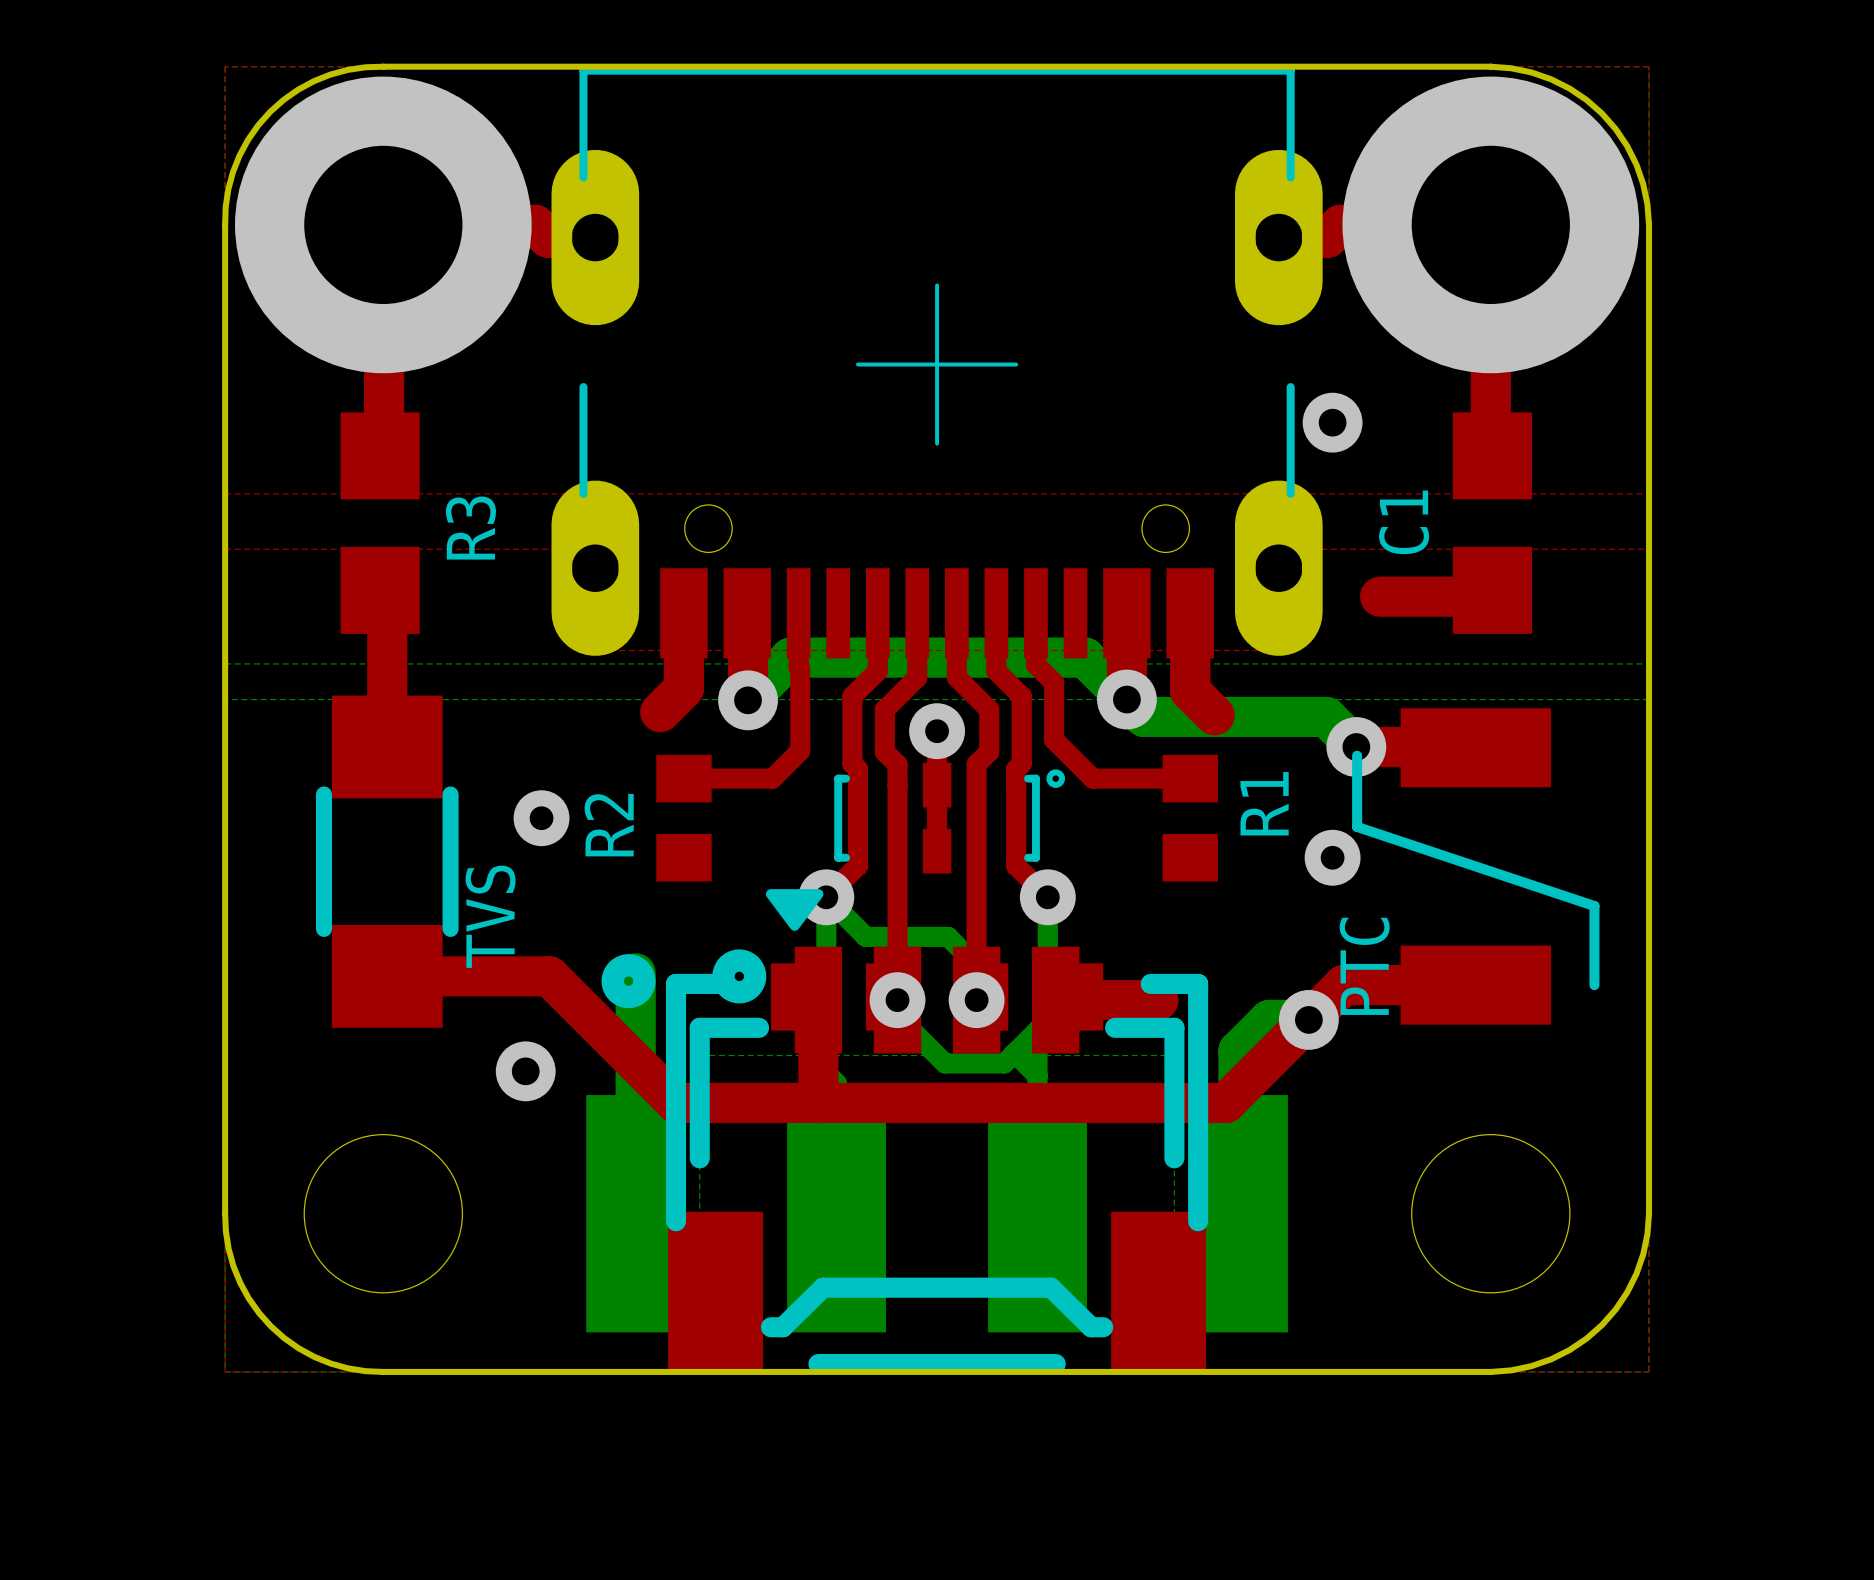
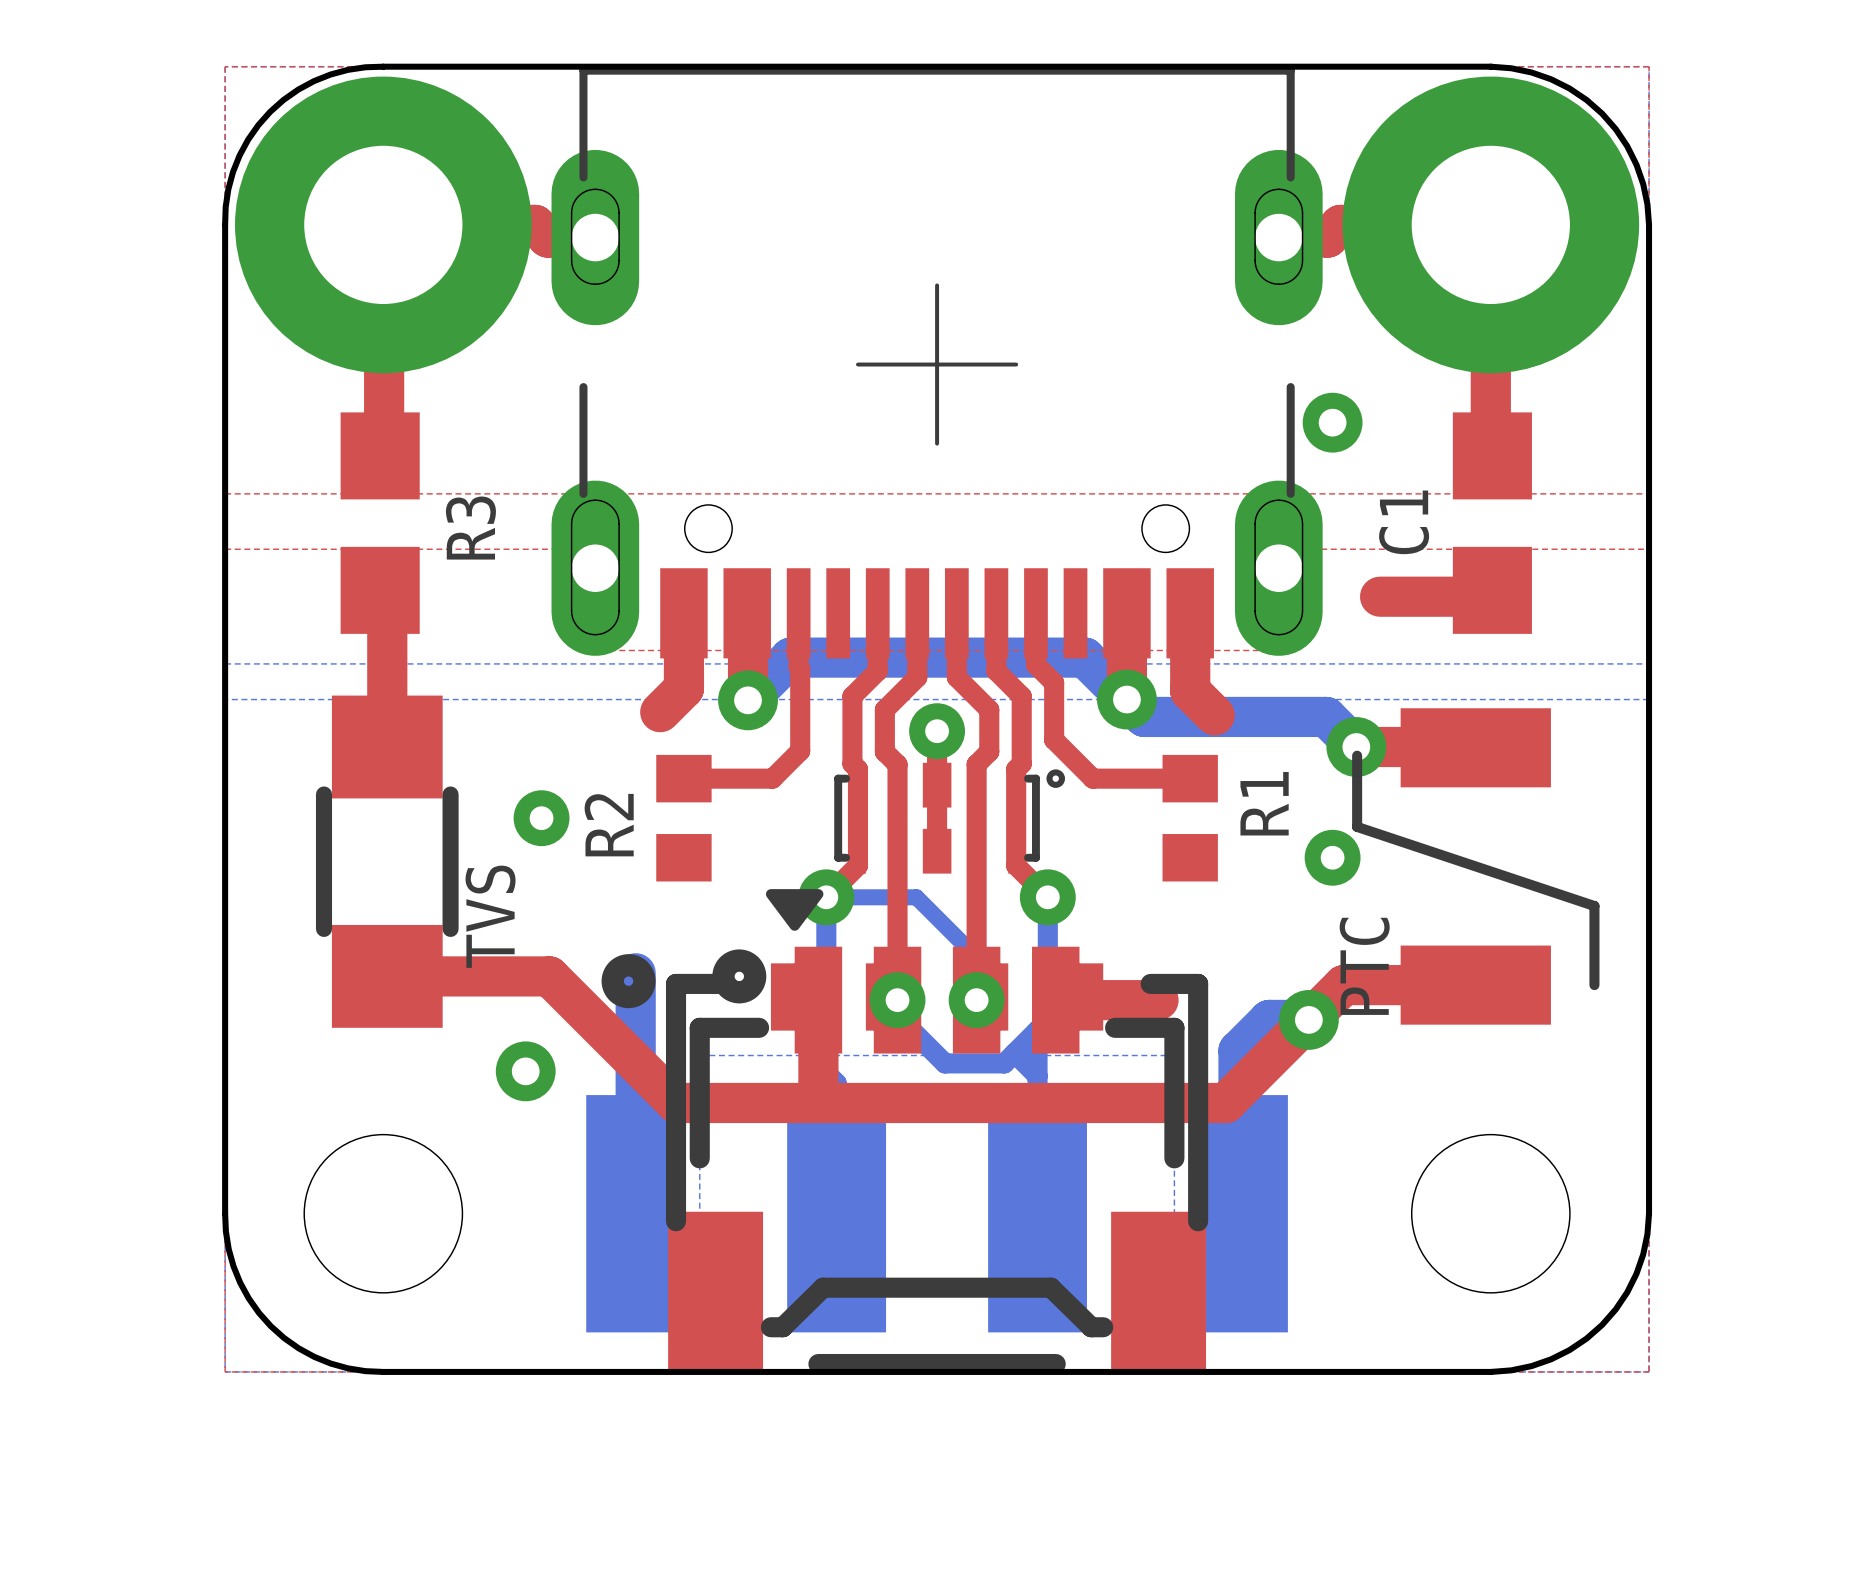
bottom track: (826, 897) (865, 936) (948, 936) (976, 965) -> (826, 897) (916, 897) (976, 957) (976, 965)

